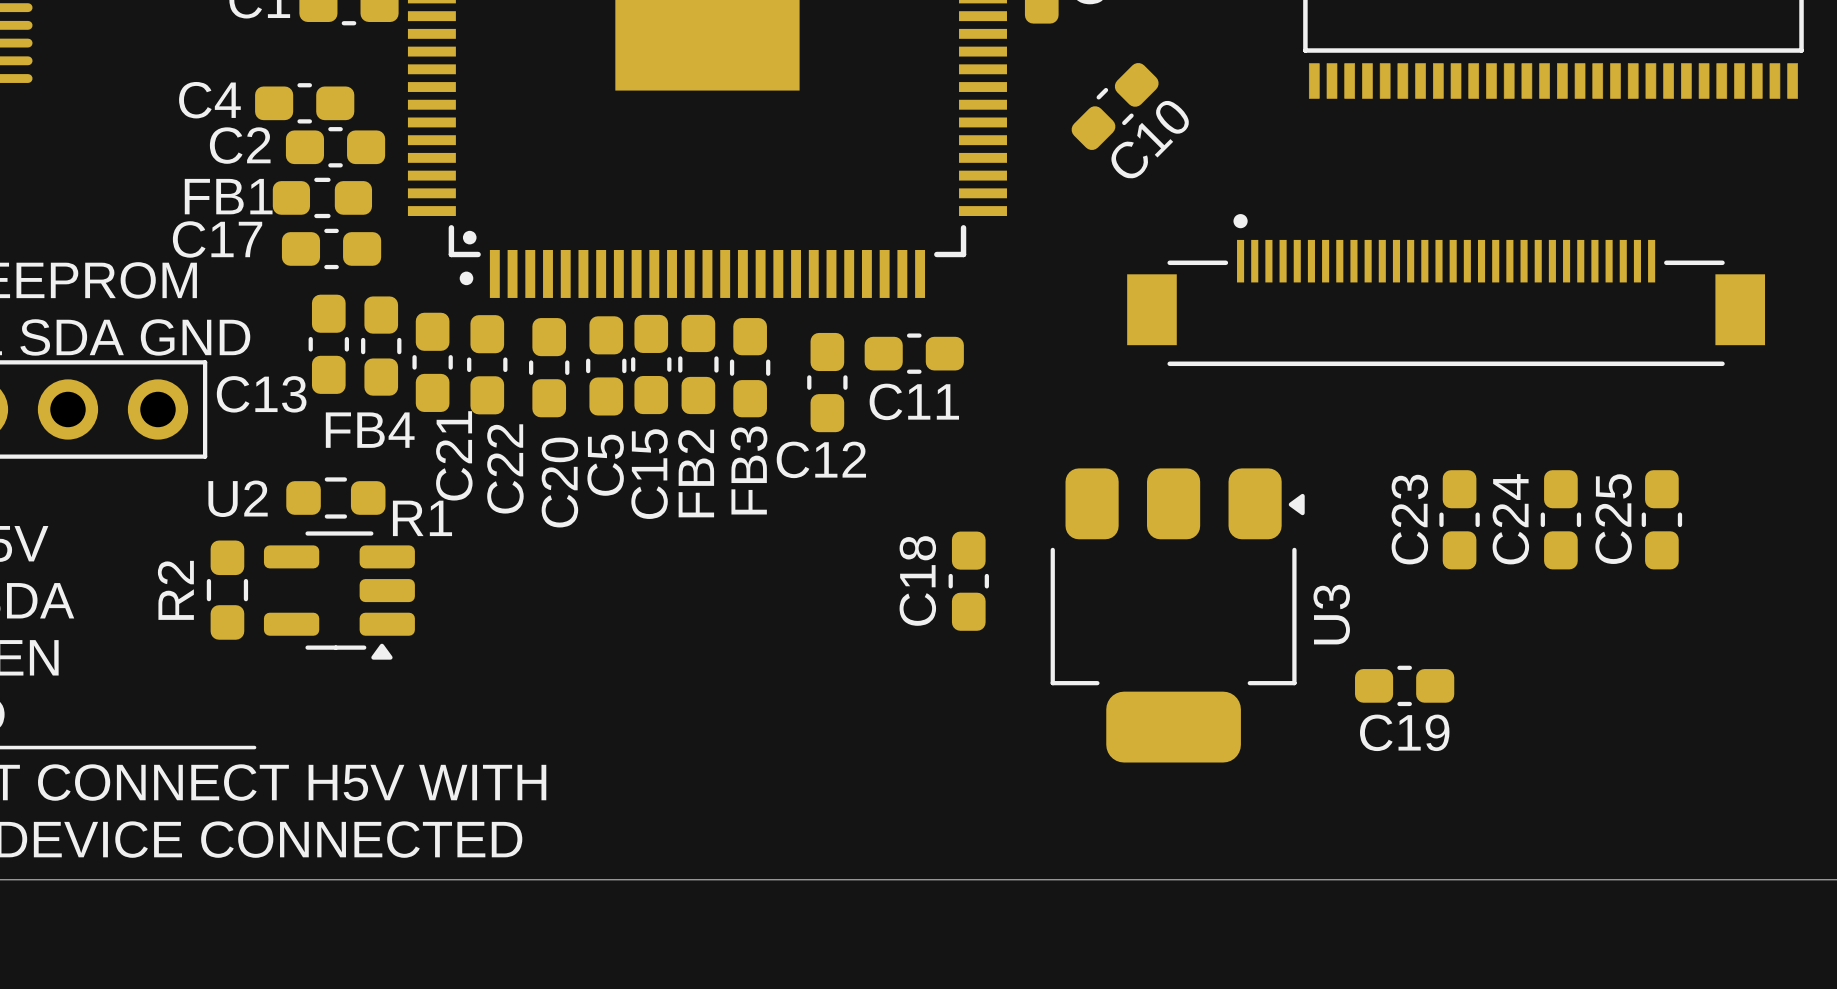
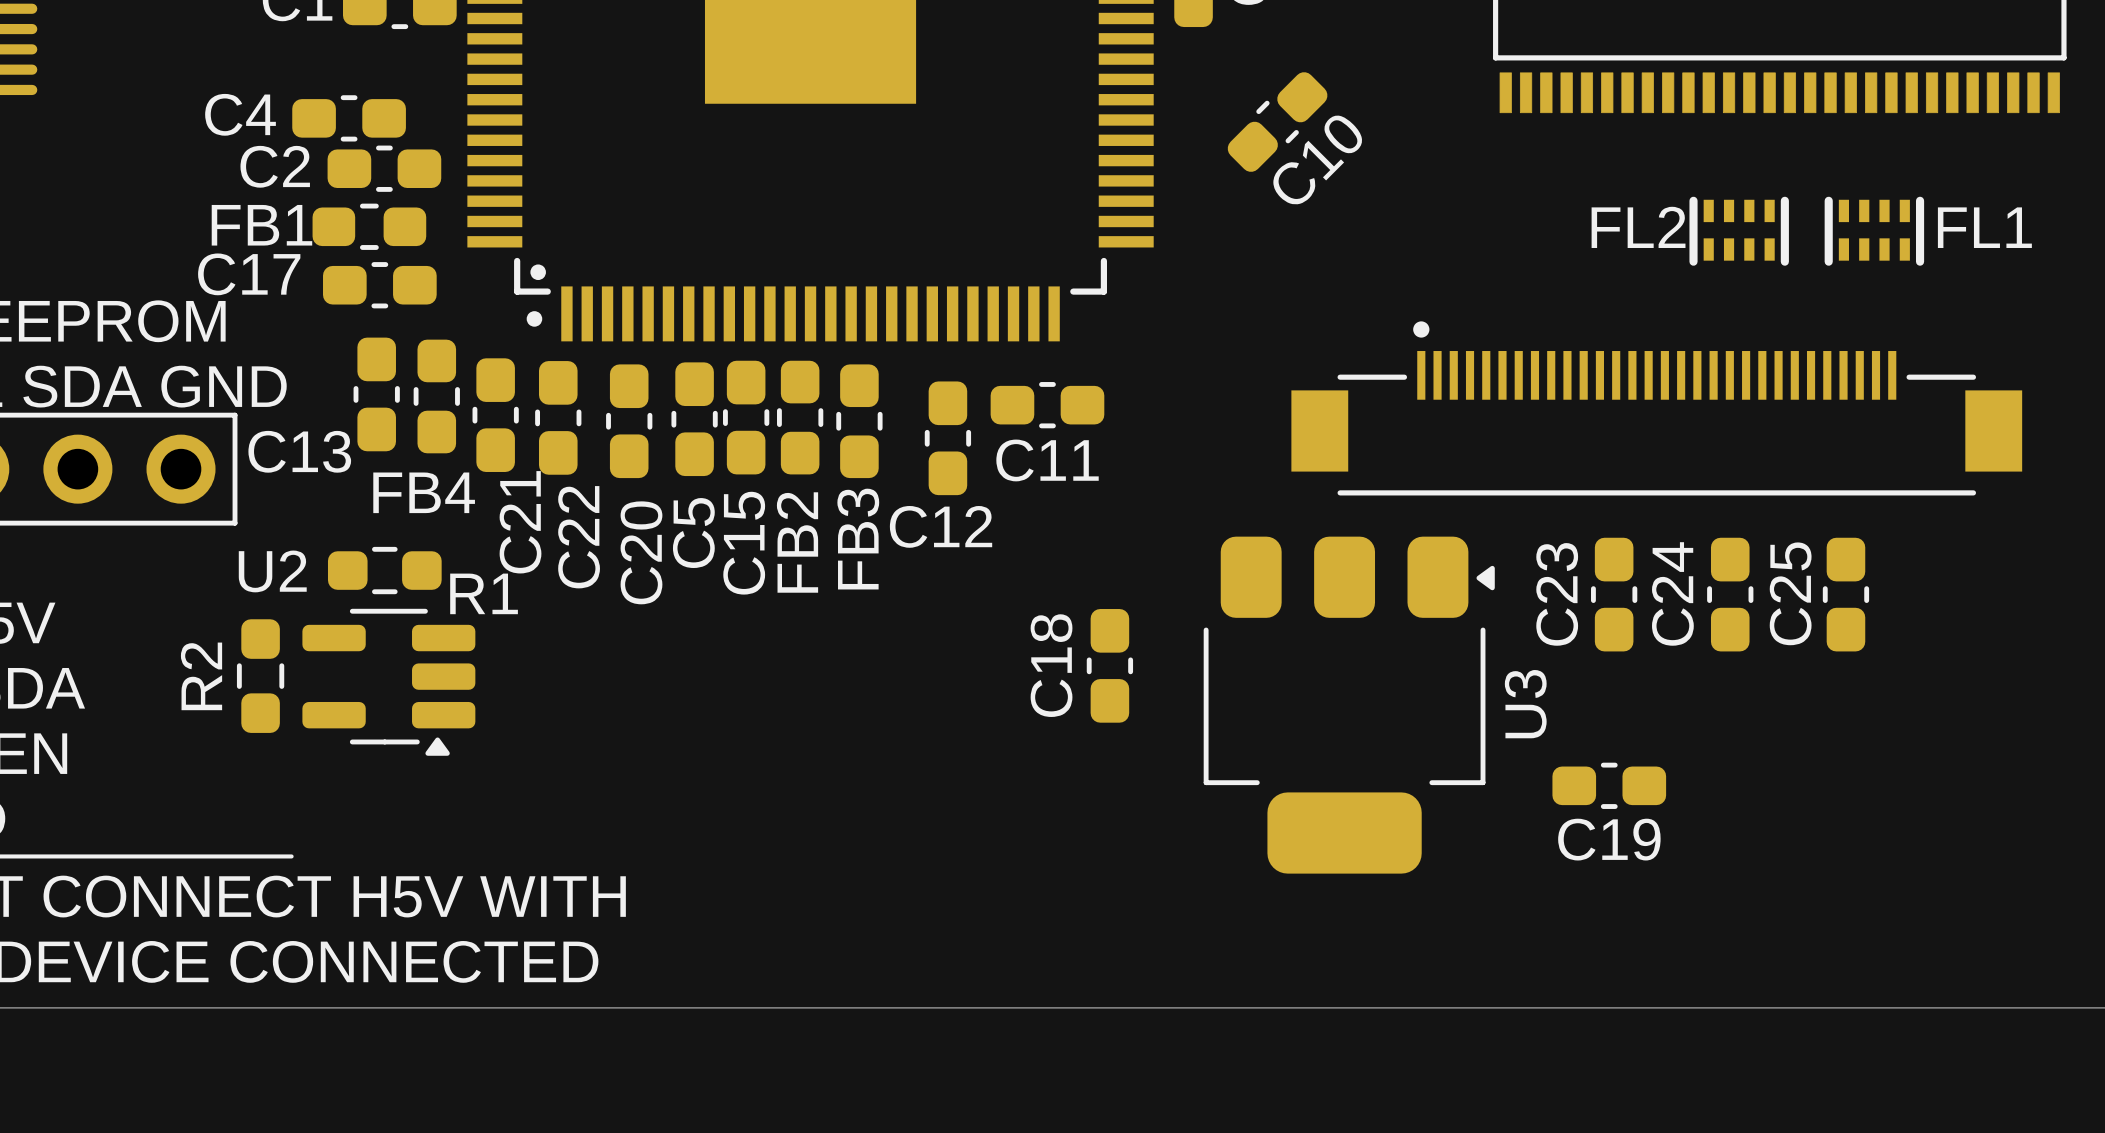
FL2: none -> (1739, 231)
FL1: none -> (1874, 231)
part position: (1446, 290) -> (1656, 408)
C23 position: (1459, 519) -> (1614, 594)
C24 position: (1560, 519) -> (1730, 594)
C25 position: (1661, 519) -> (1845, 594)

